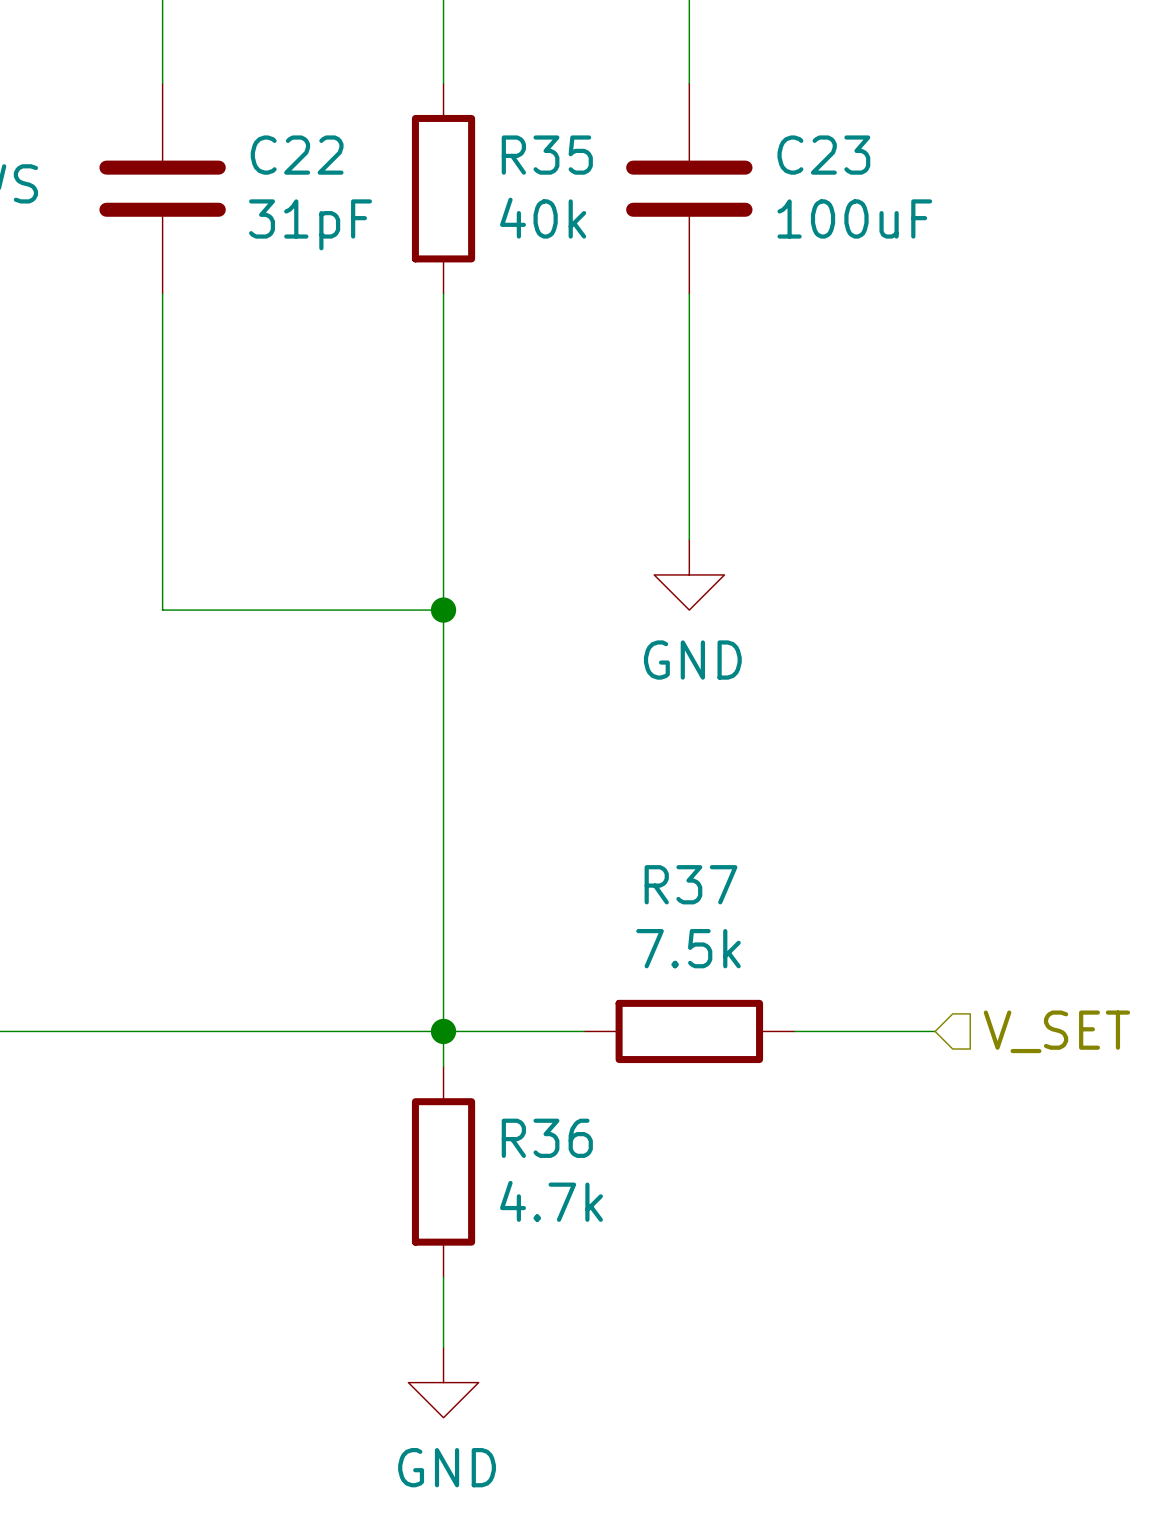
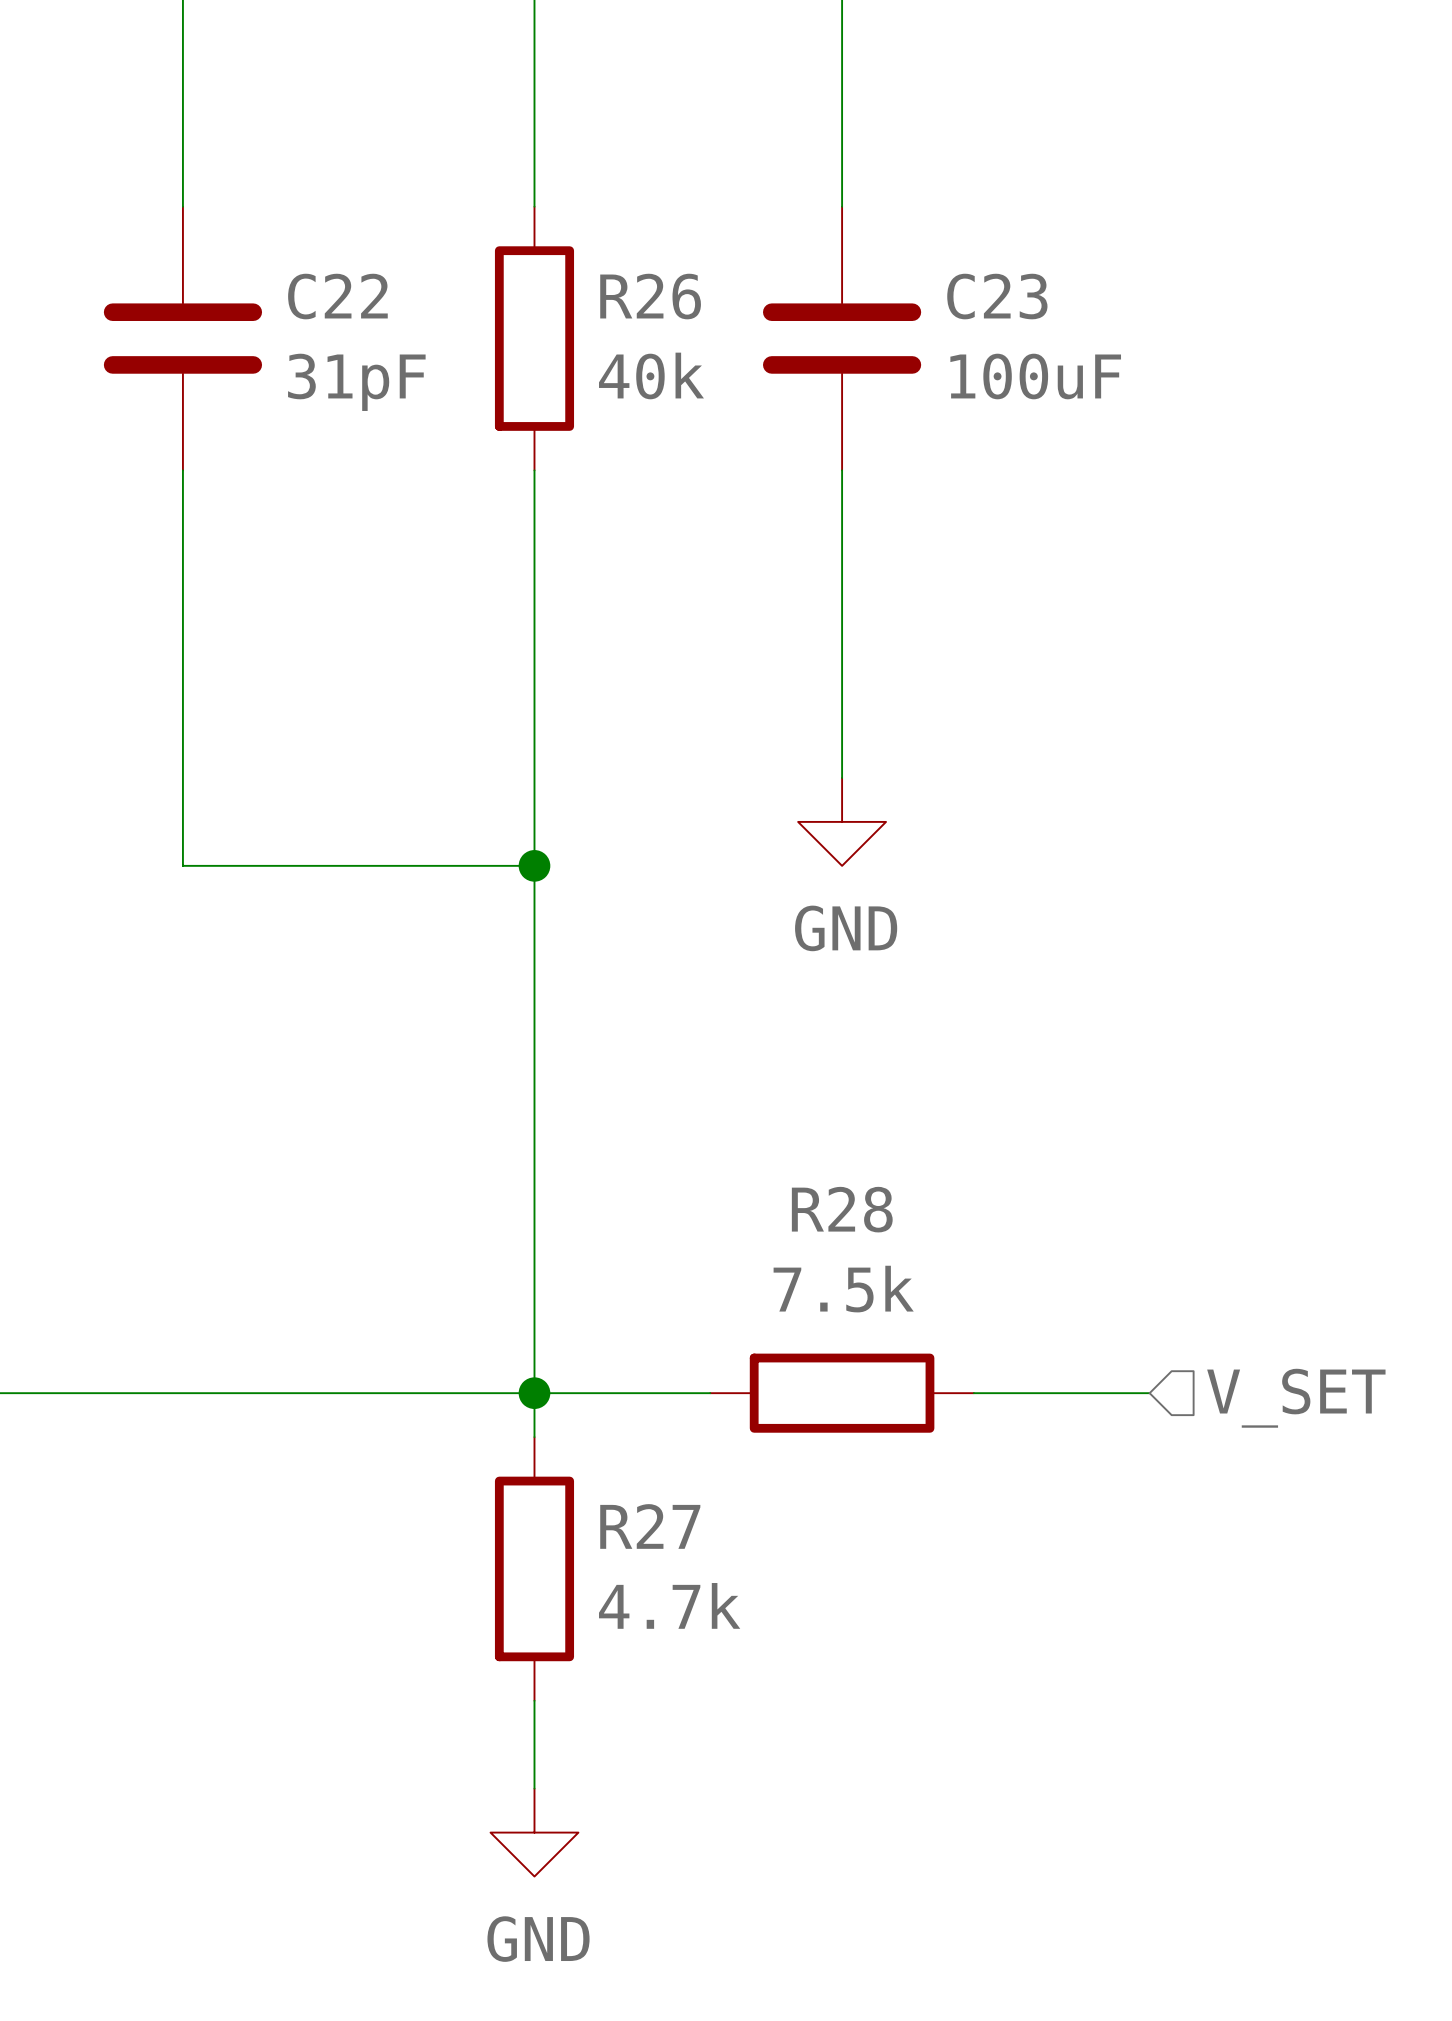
R35 name: R35 (547, 155) -> R26 (650, 296)
R37 name: R37 (691, 884) -> R28 (842, 1209)
R36 name: R36 (547, 1138) -> R27 (650, 1526)

